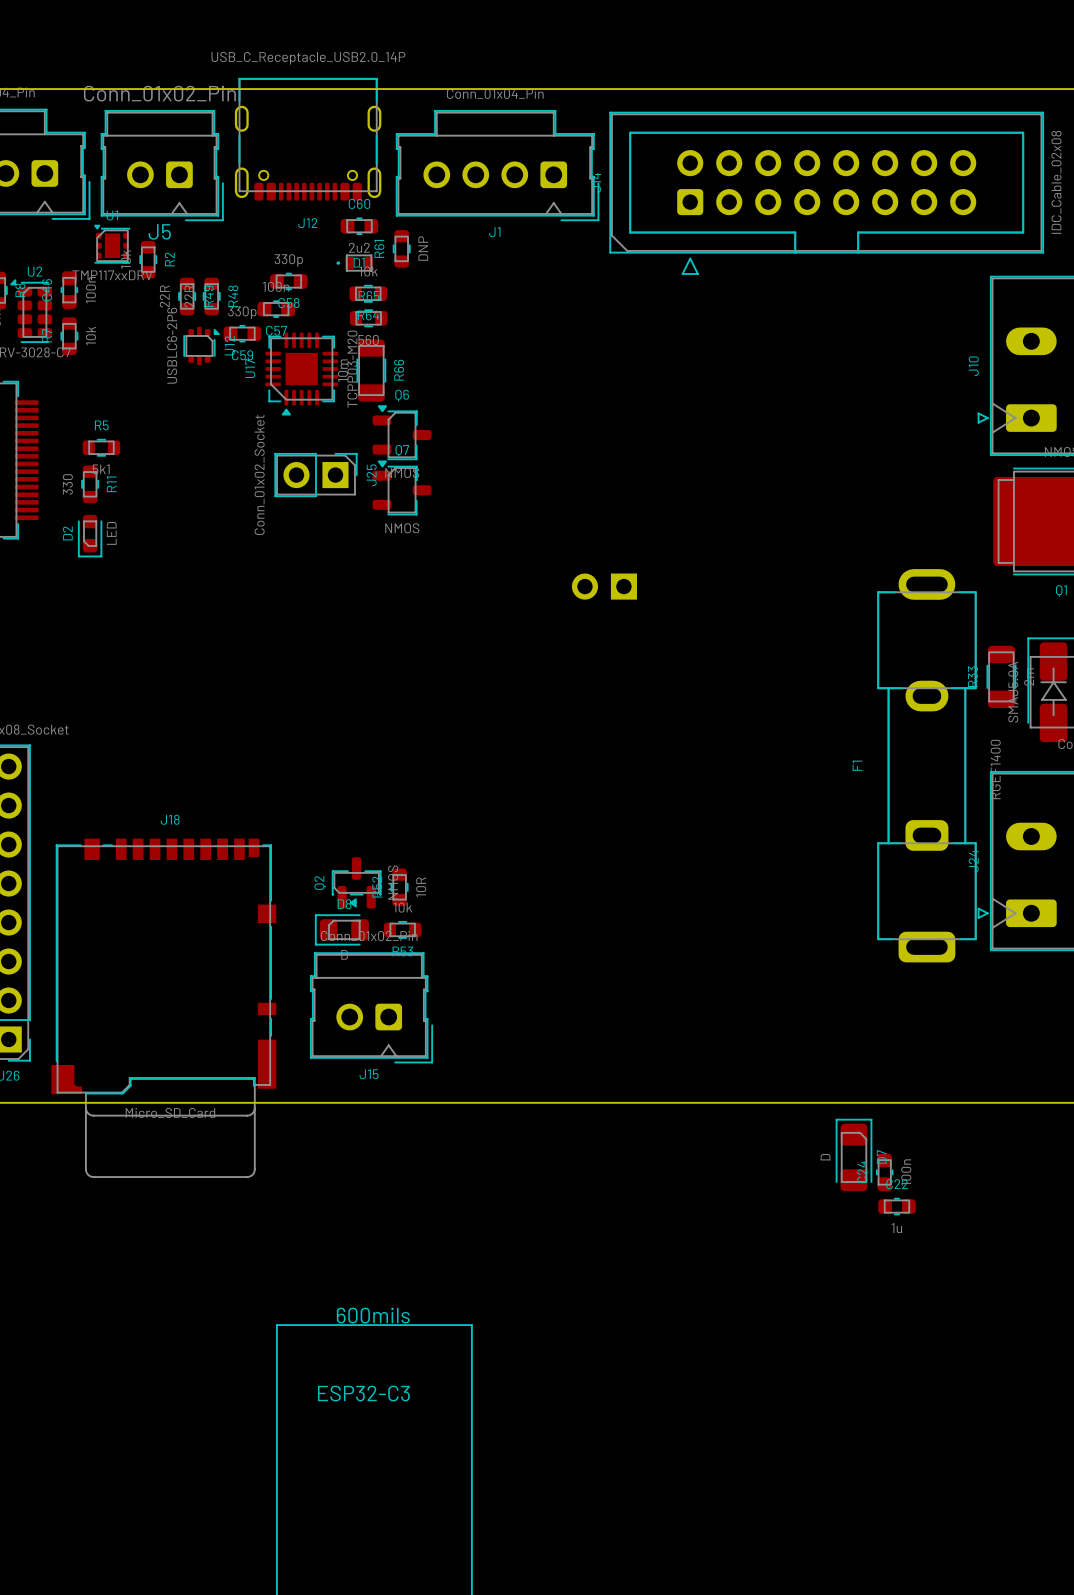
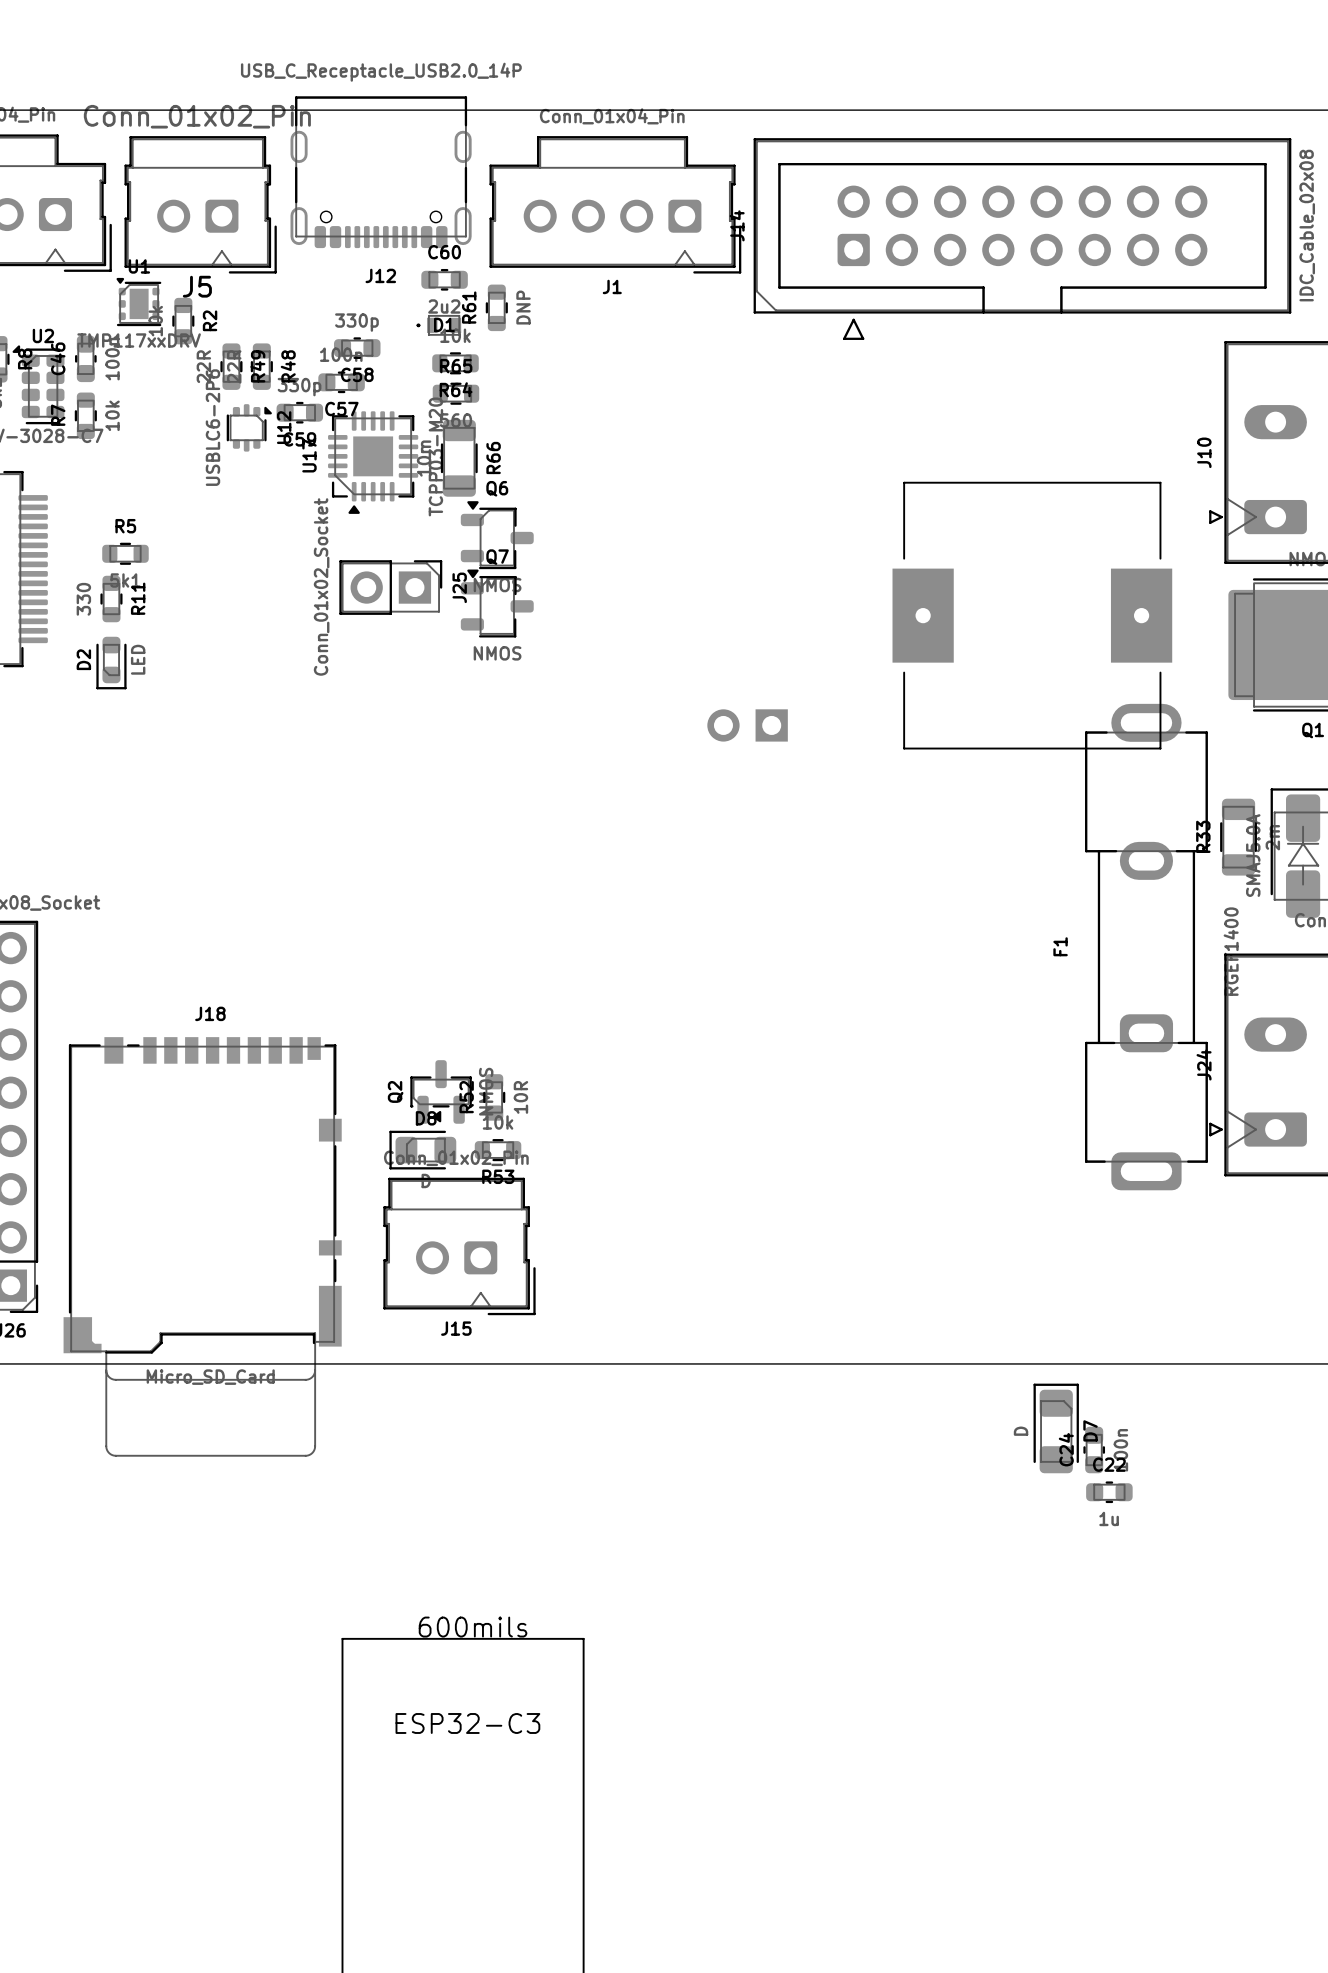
part: none -> (1032, 615)

